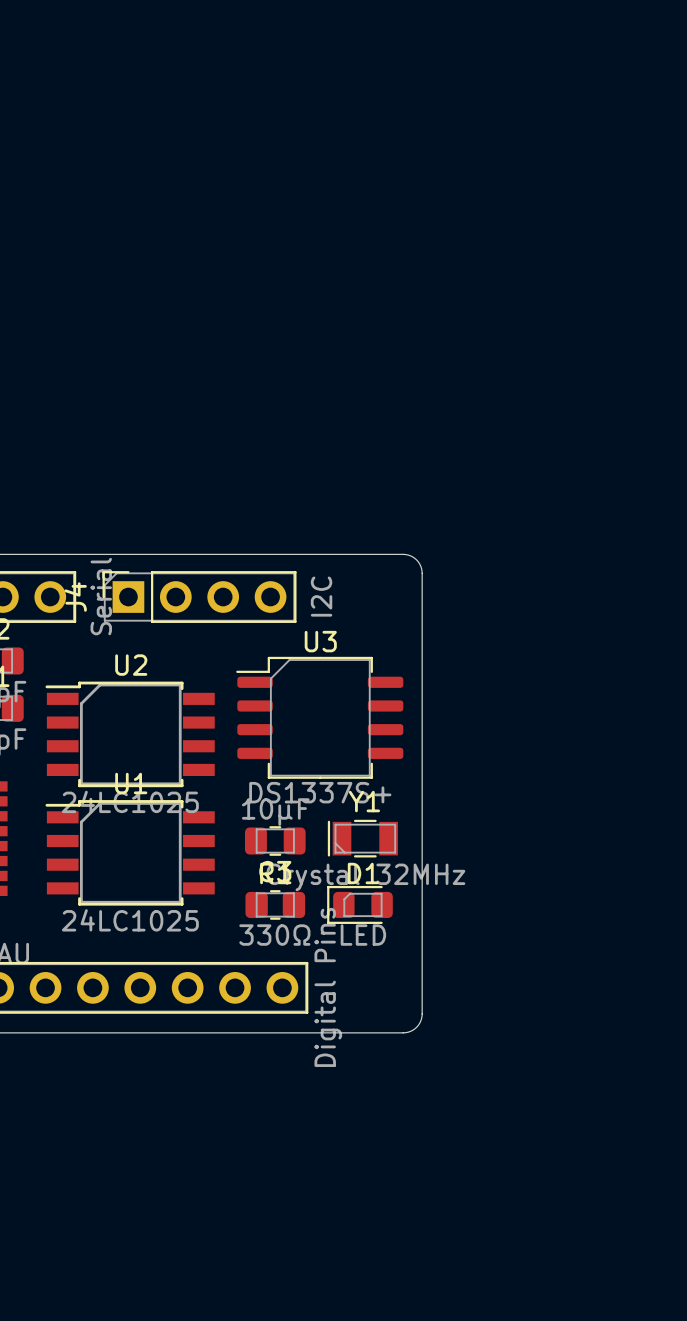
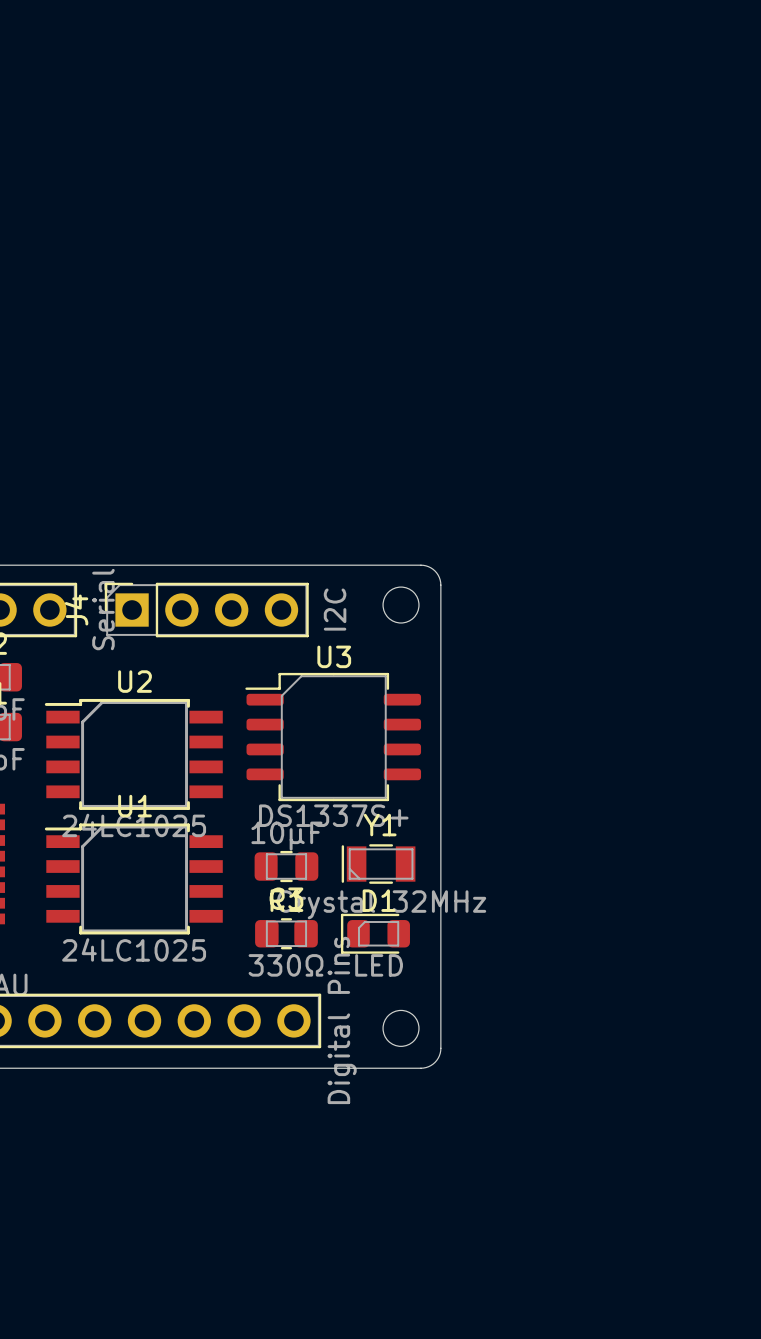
round board edge: none -> [382, 586, 420, 624]
round board edge: none -> [382, 1009, 420, 1047]

